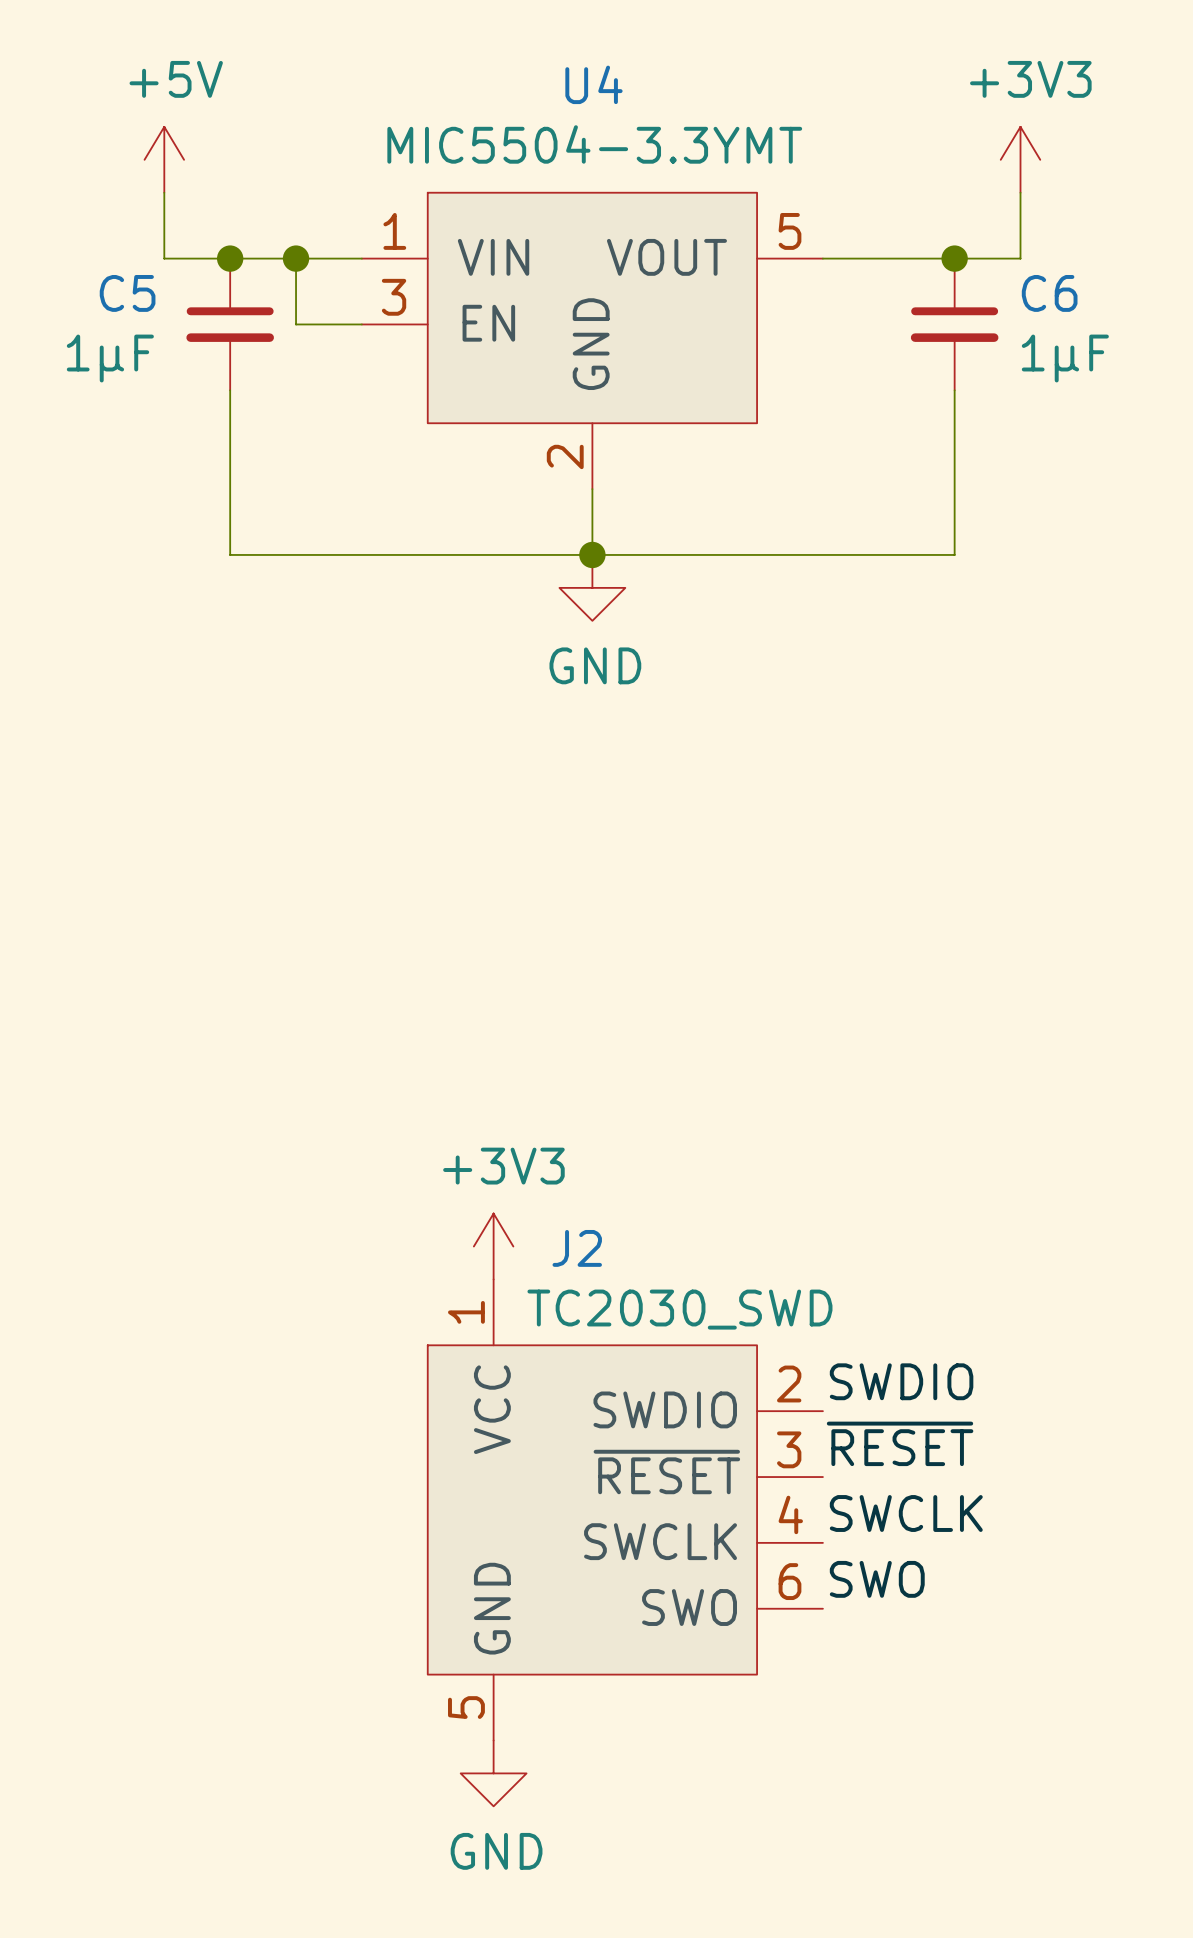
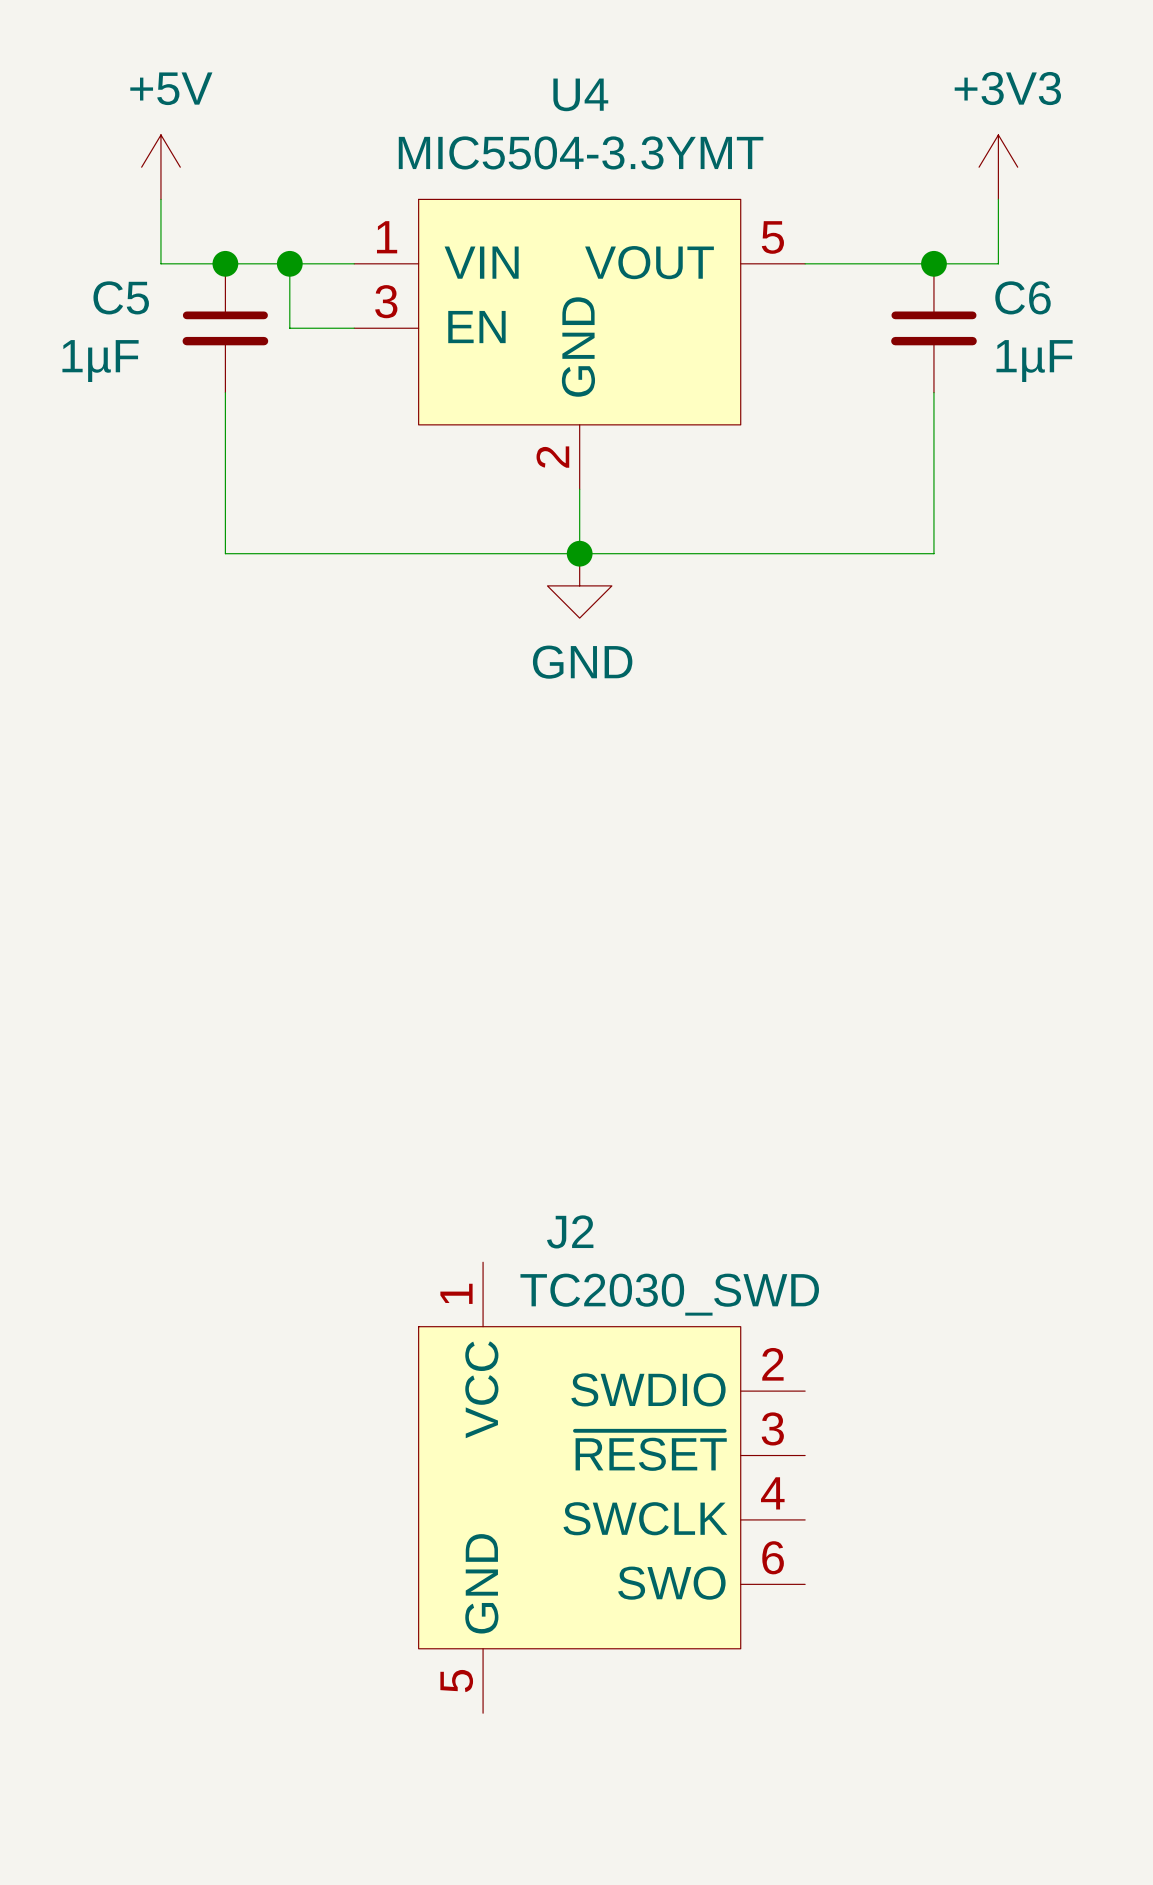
power symbol: +3V3 (493, 1246) -> none
label: SWDIO (901, 1381) -> none
label: ~{RESET} (900, 1443) -> none
label: SWCLK (906, 1513) -> none
label: SWO (877, 1579) -> none
power symbol: GND (493, 1773) -> none

